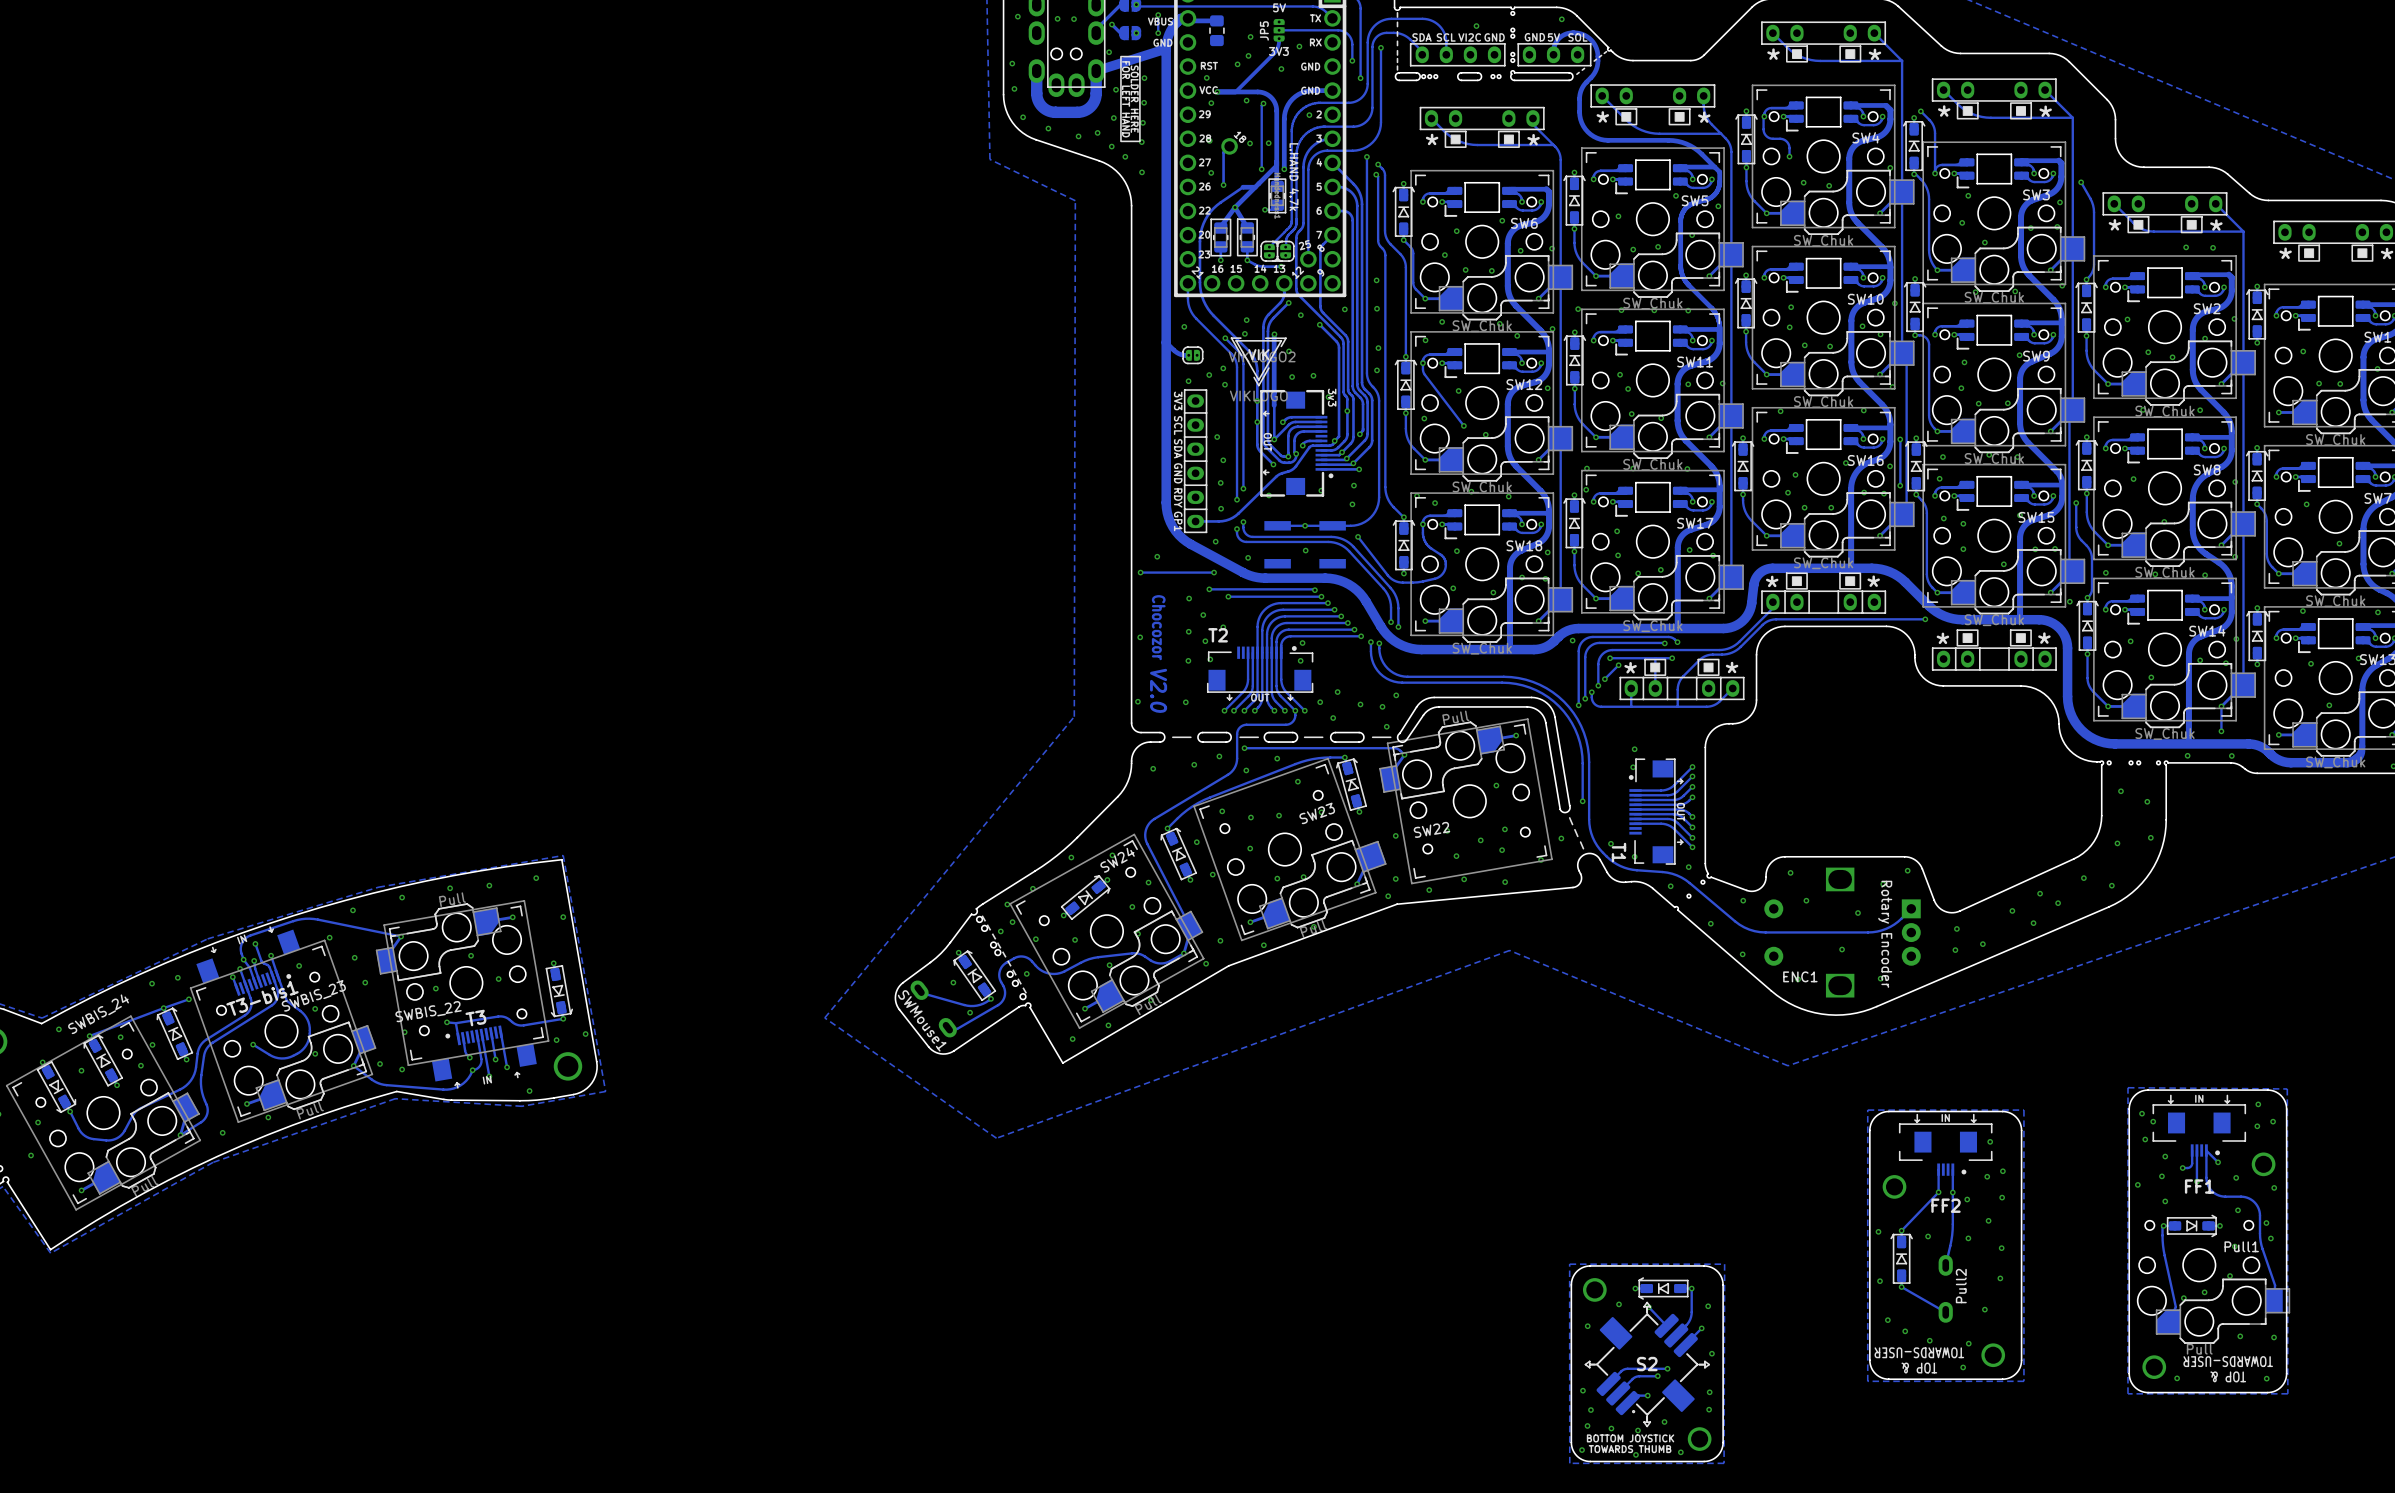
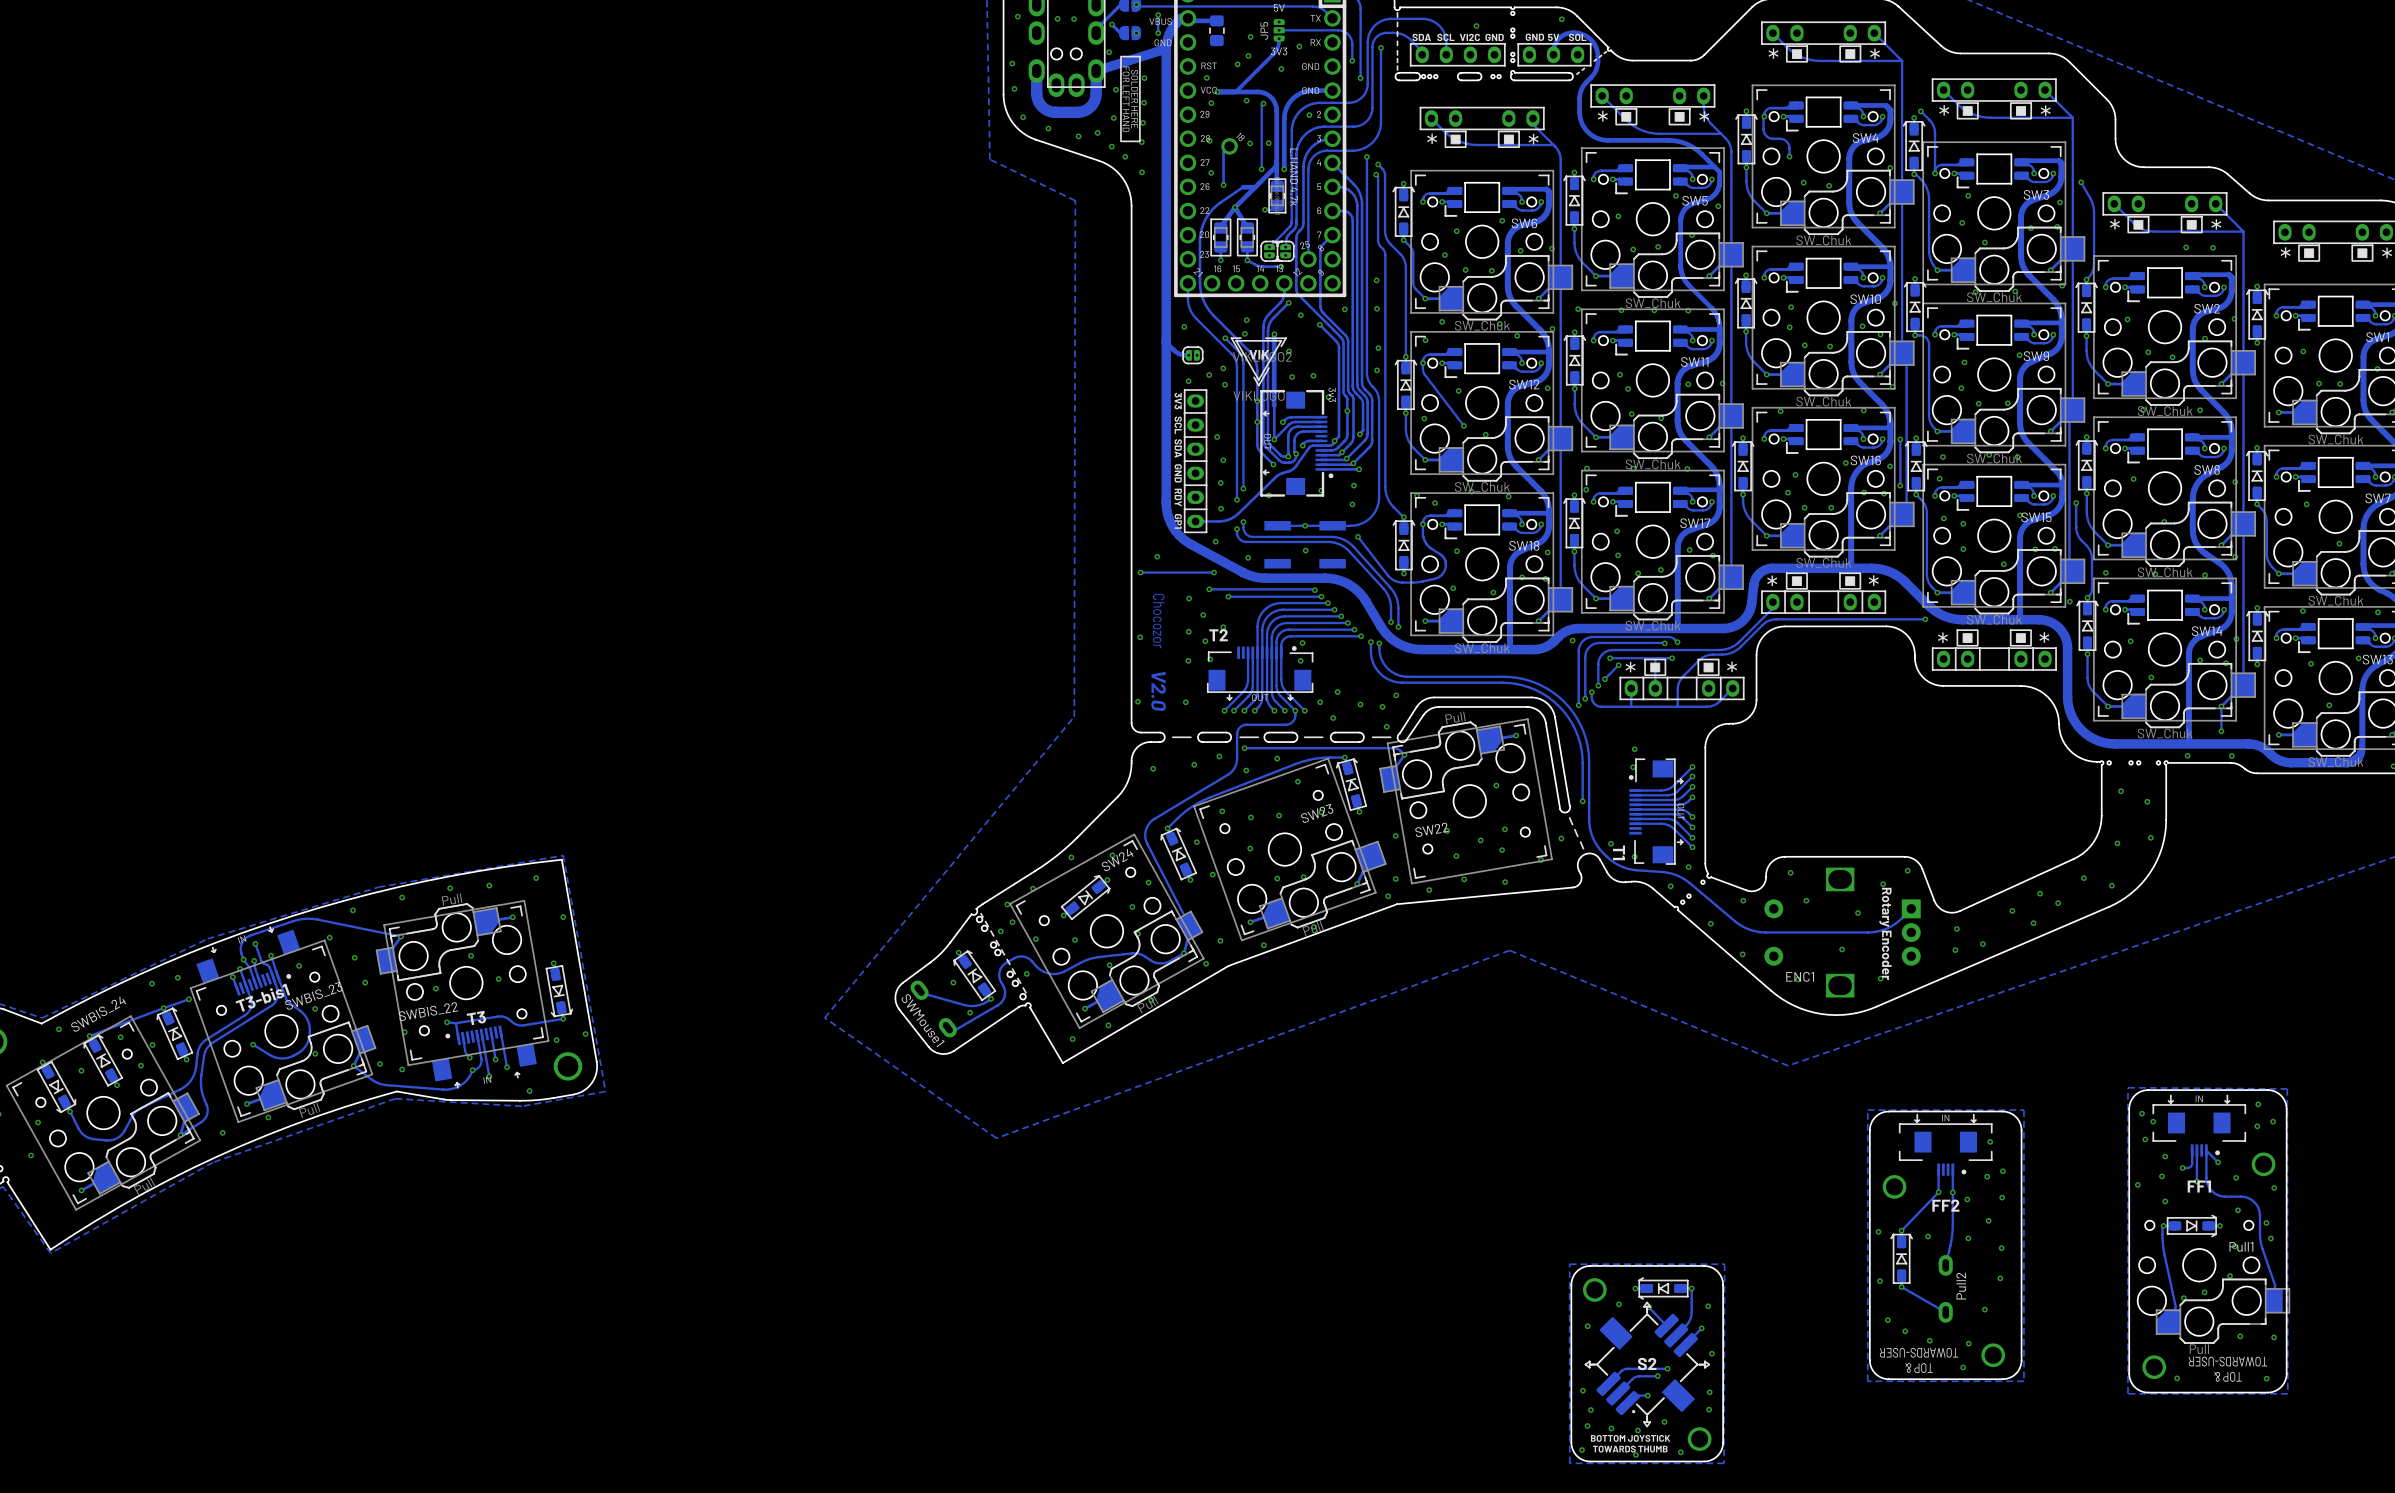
round board edge: none -> [1680, 899, 1686, 905]

